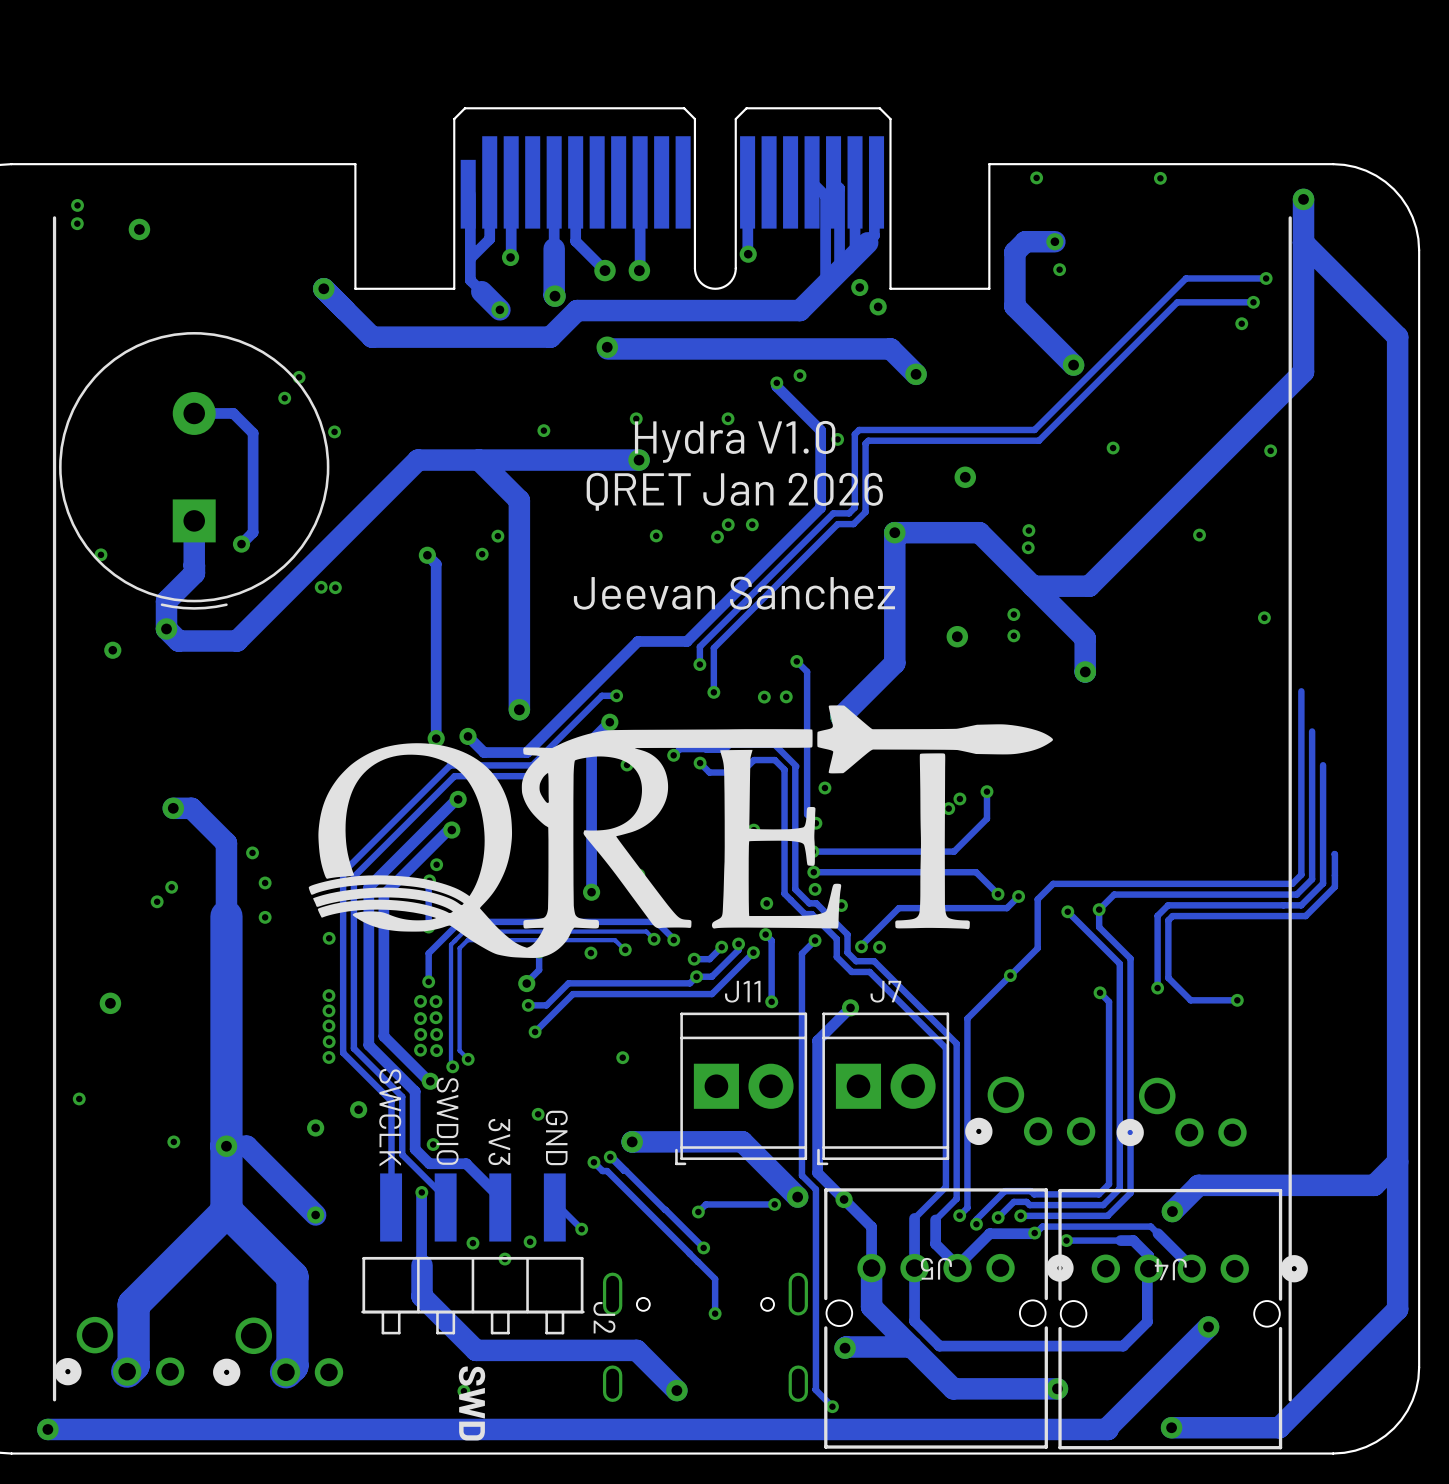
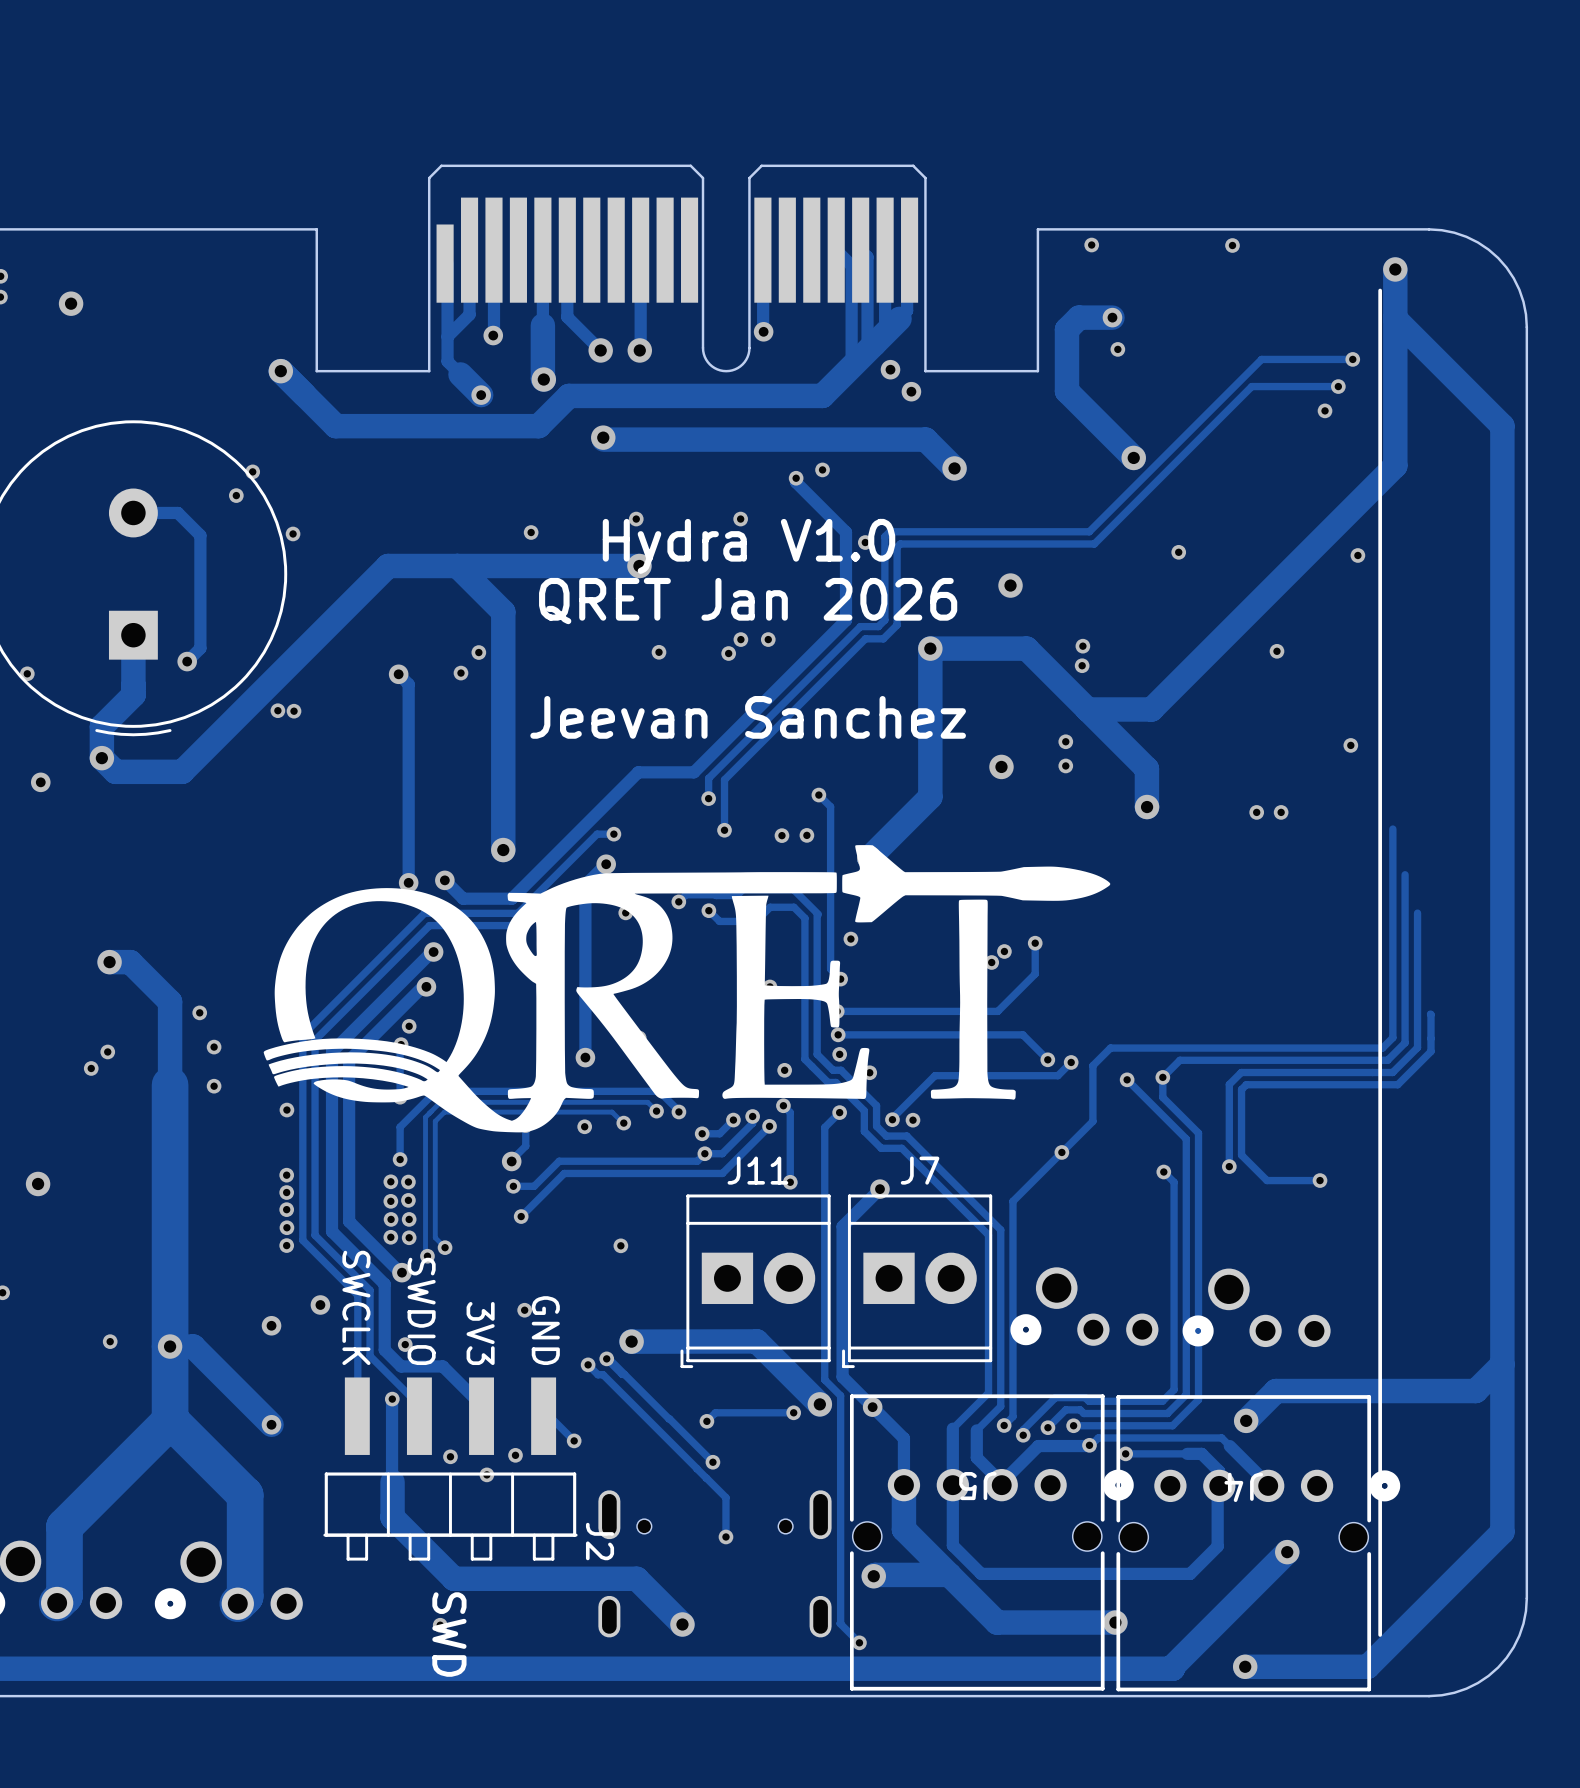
via: none -> (1256, 812)
via: none -> (1281, 812)

